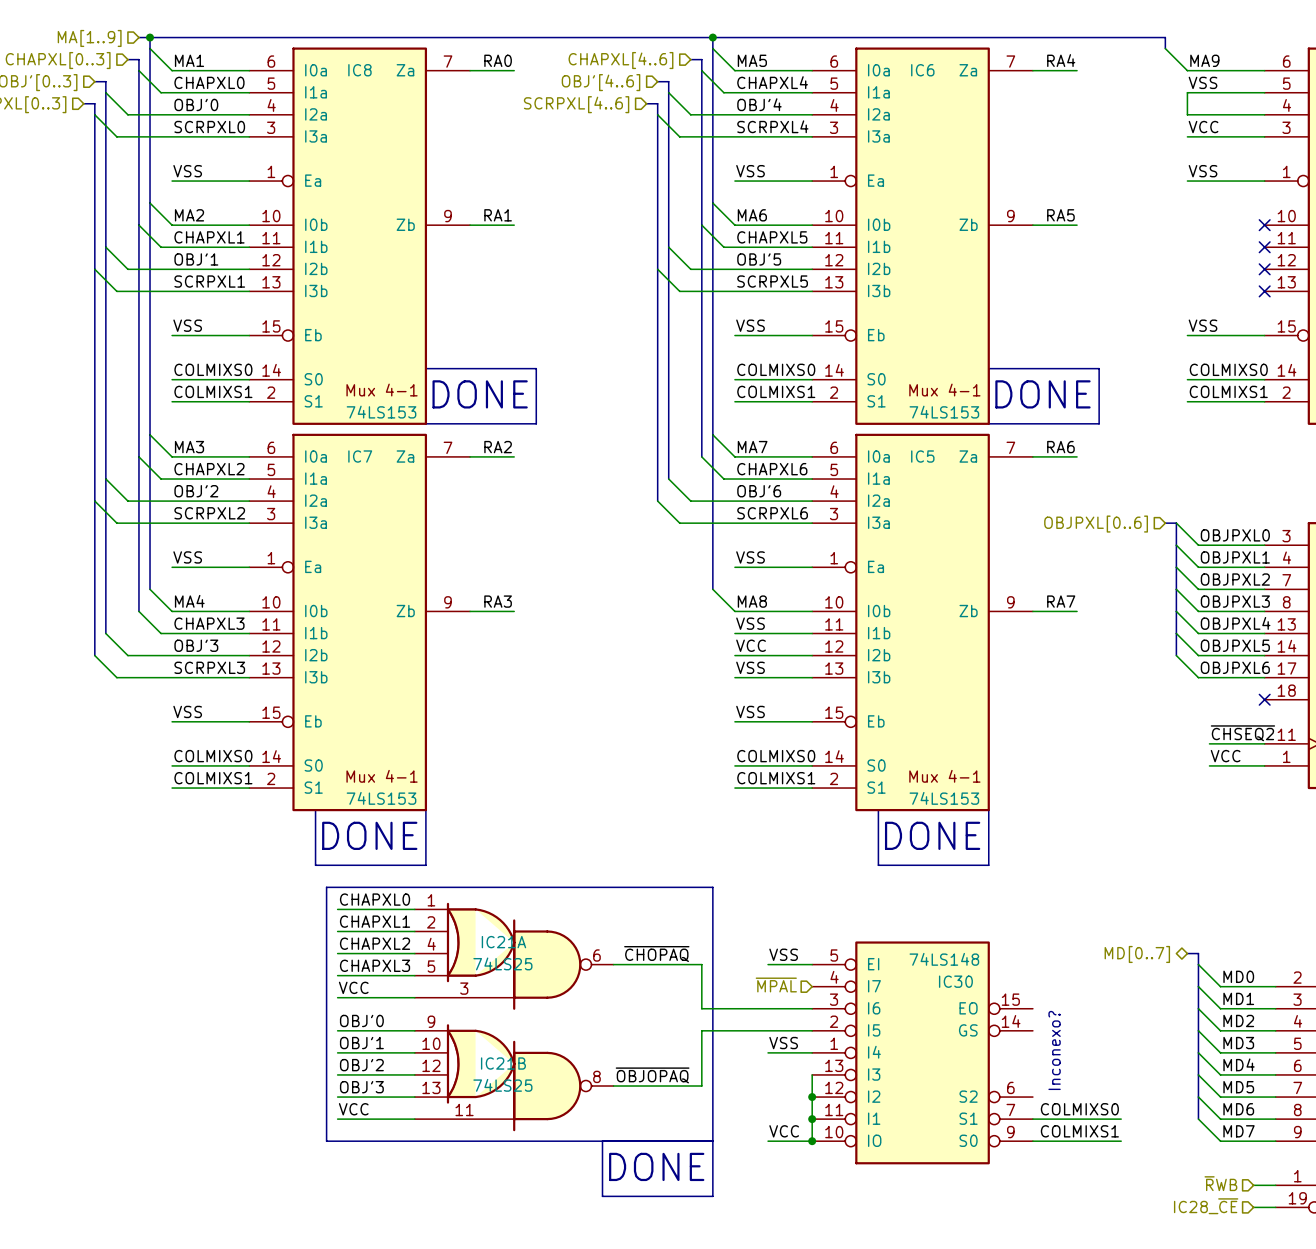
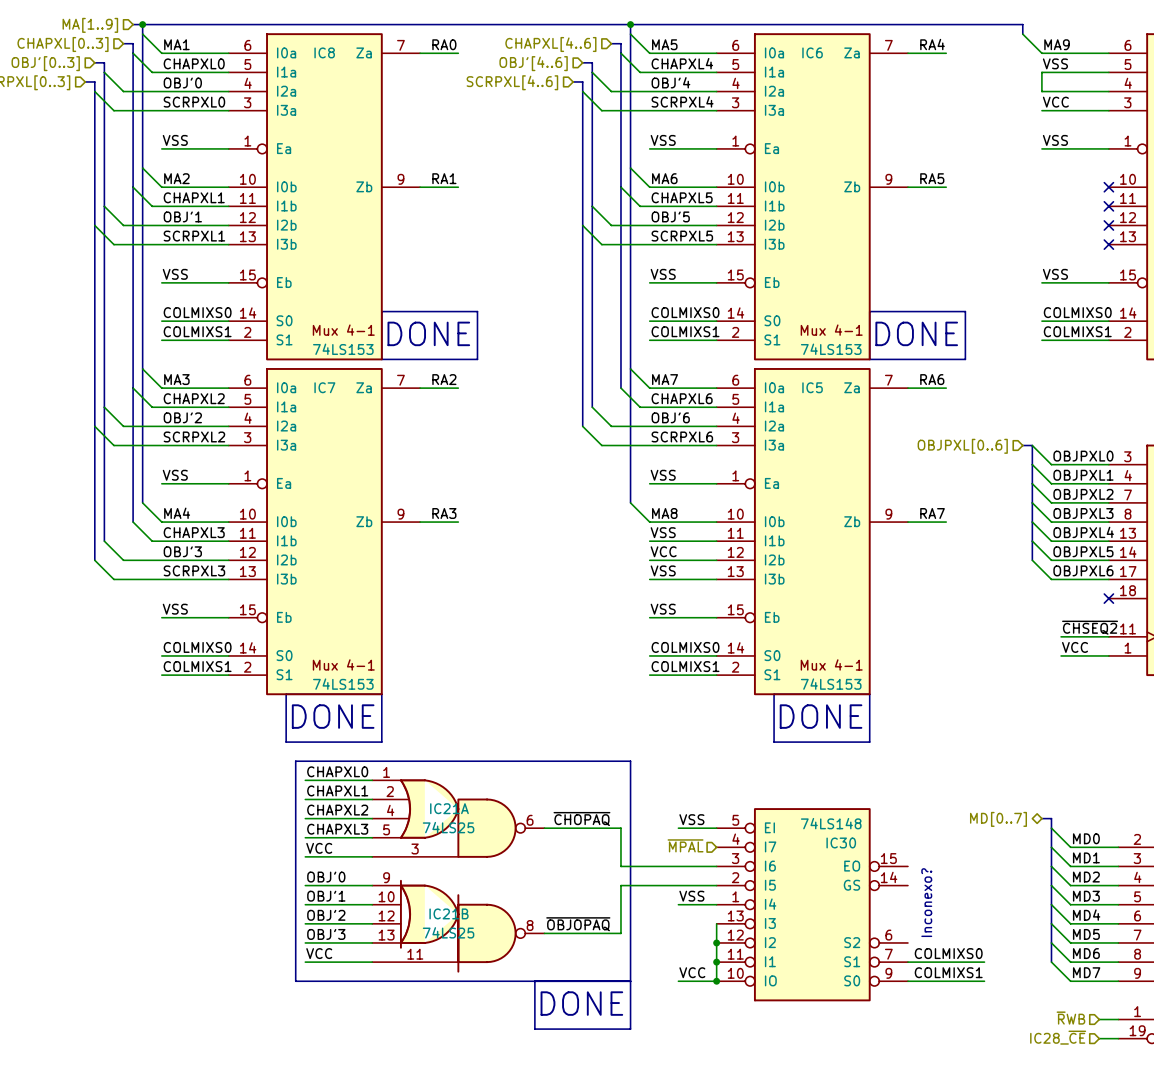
IC21A symbol: [414, 902, 614, 1010] -> [372, 779, 545, 858]

